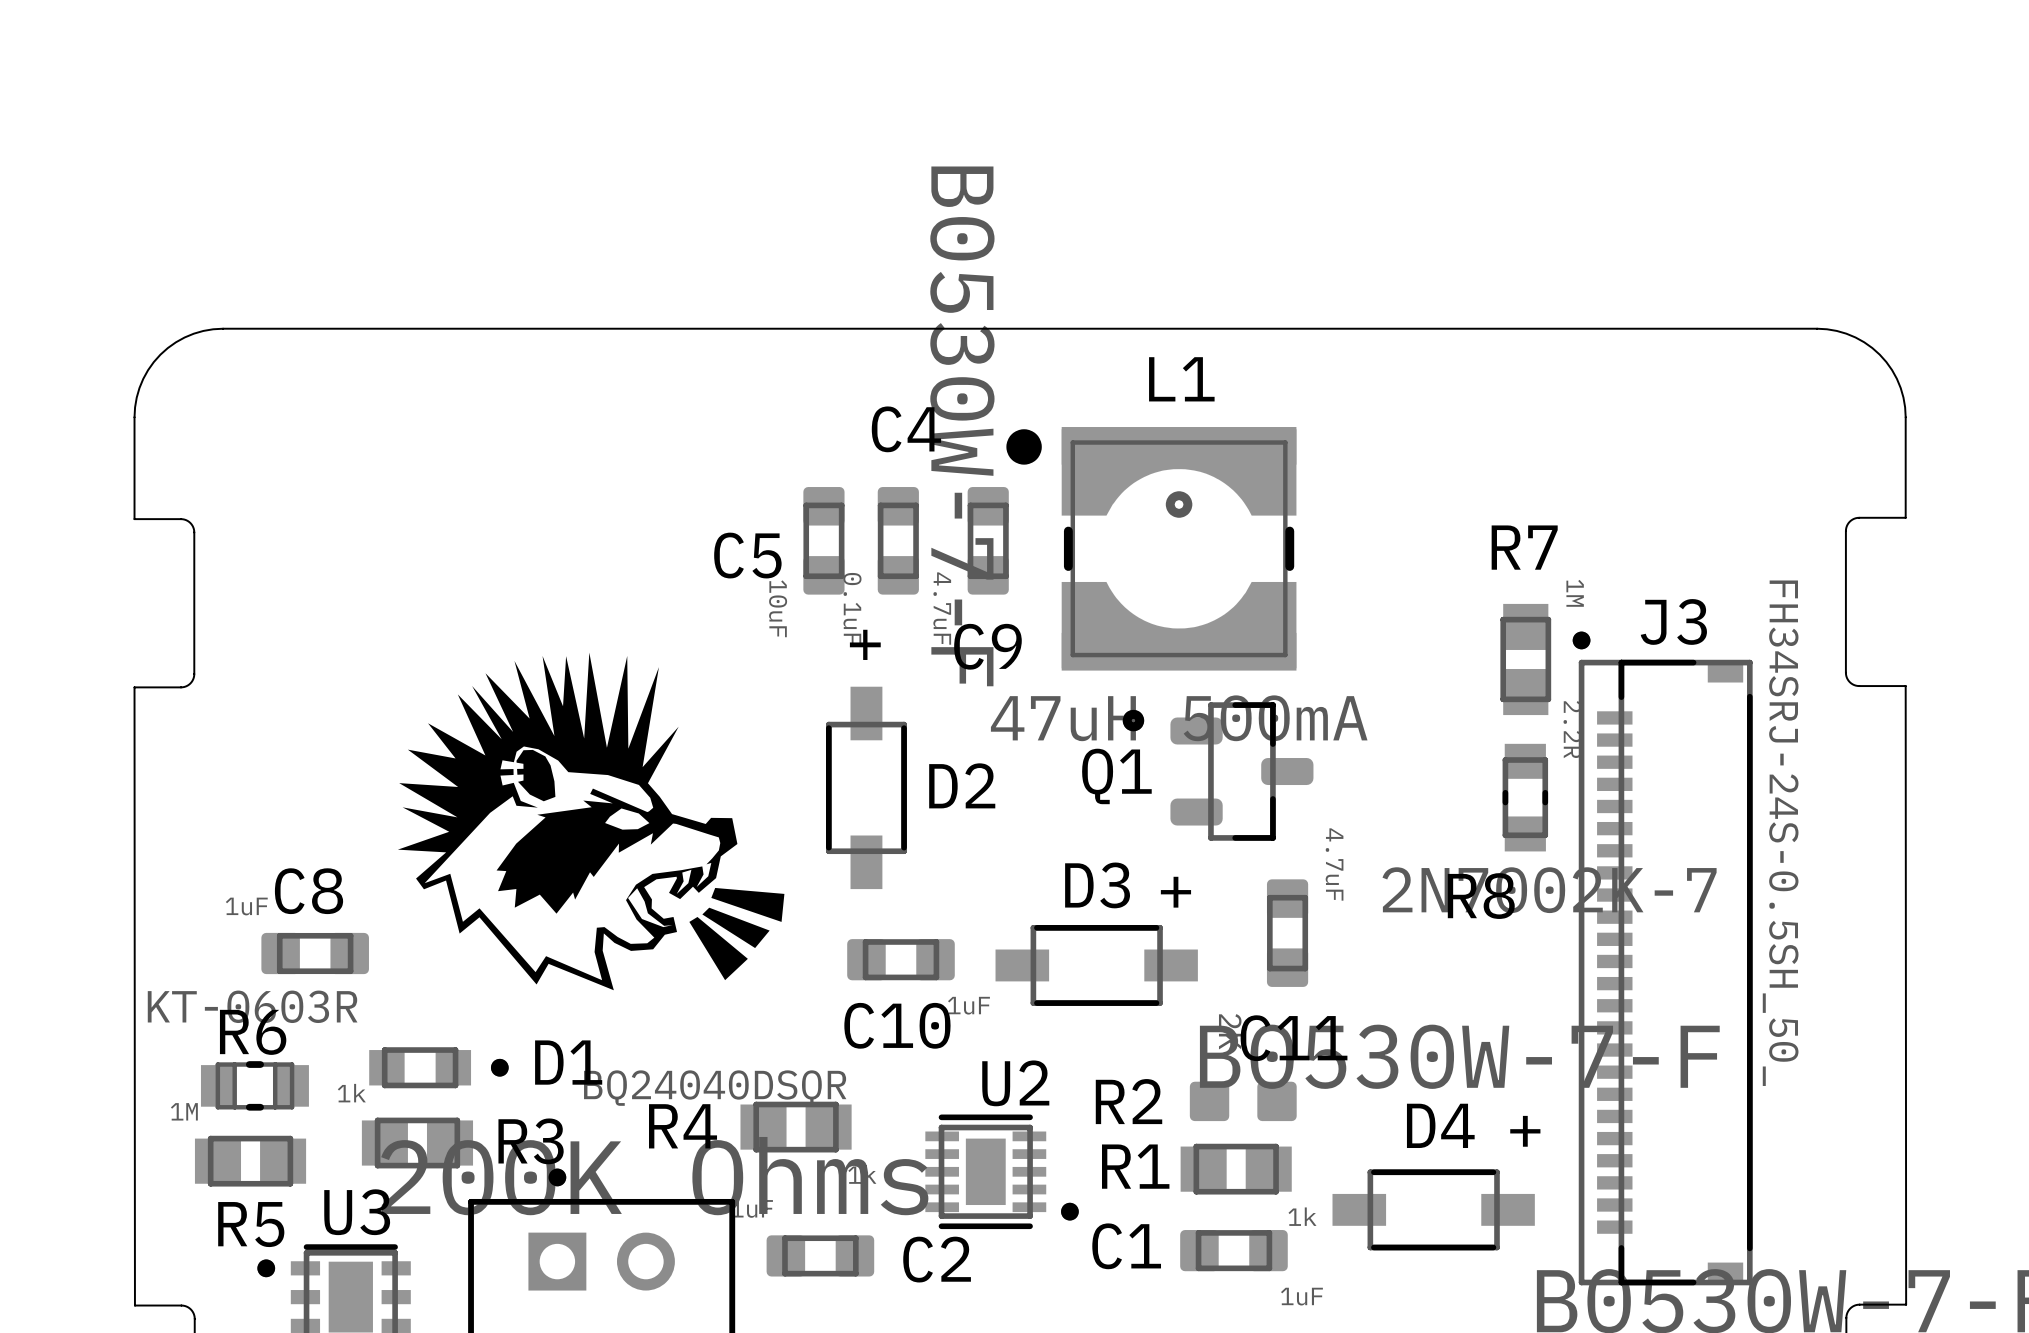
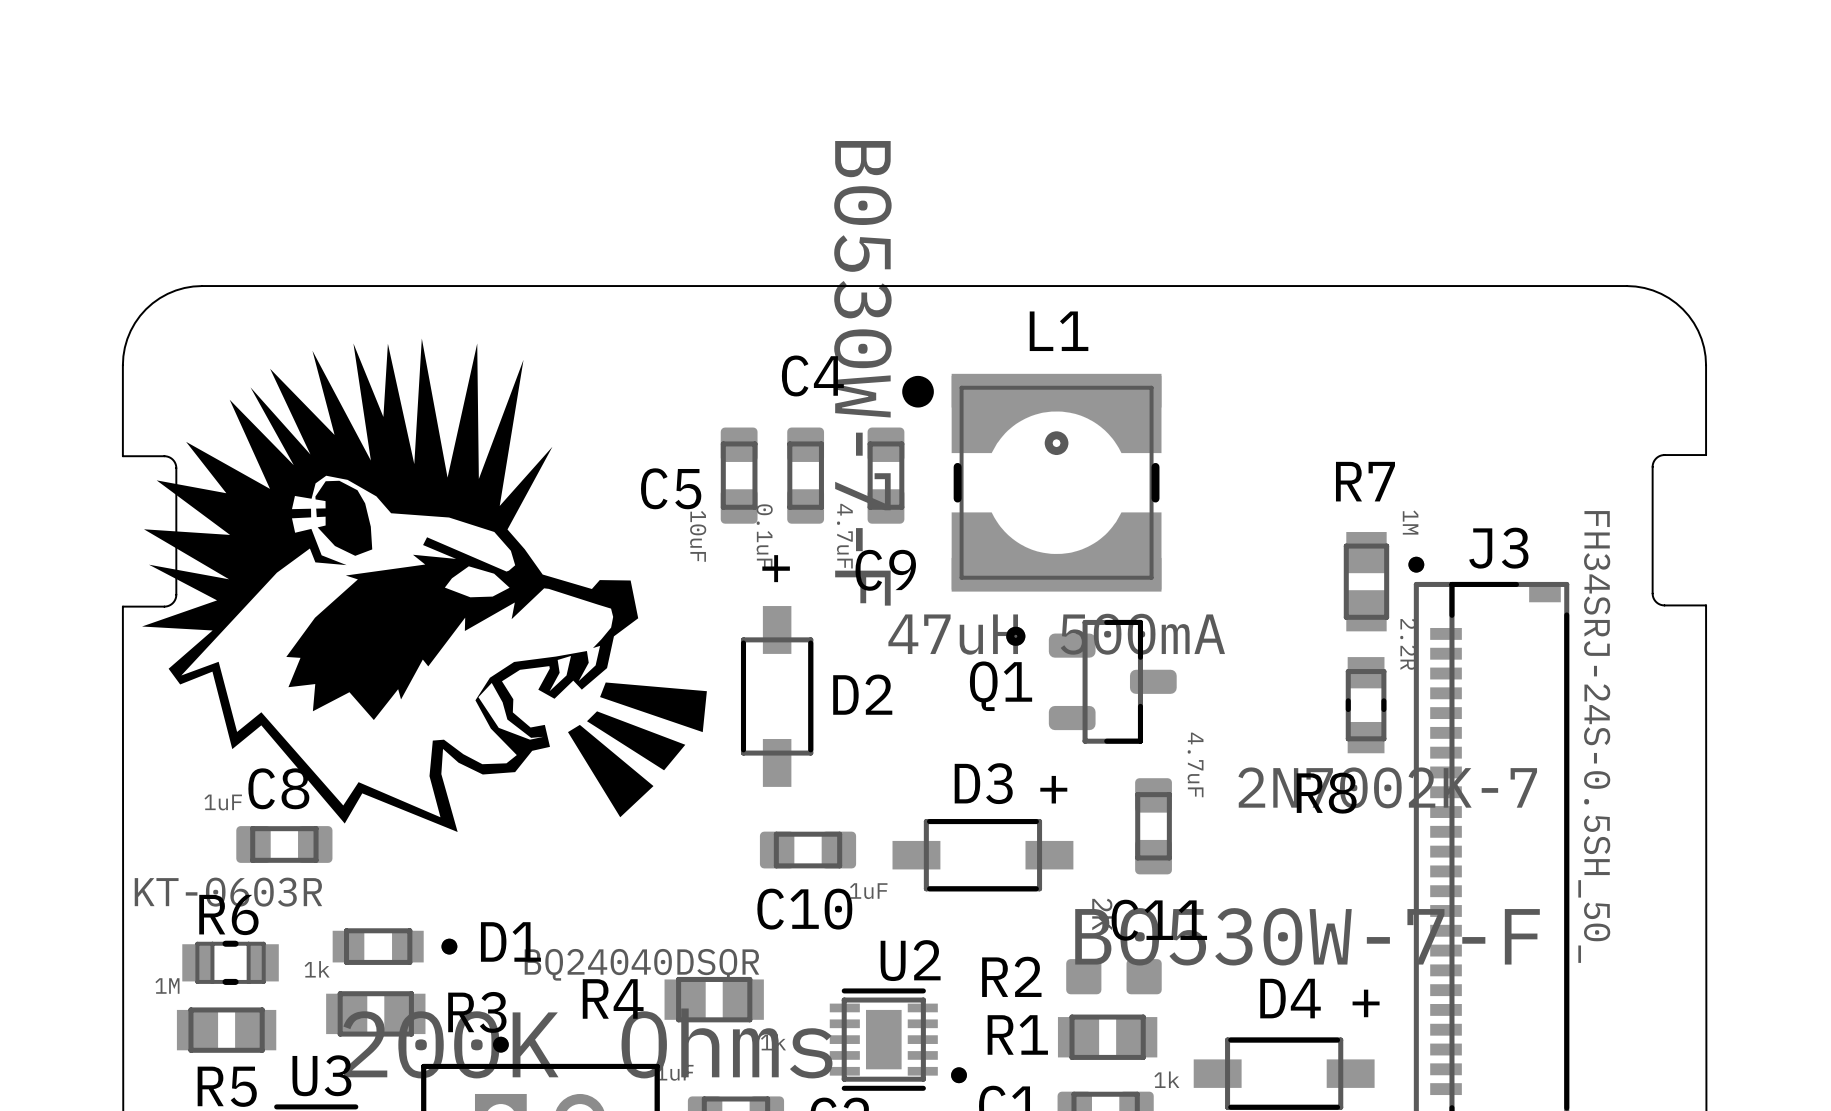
drawing: none -> [142, 338, 707, 833]
drawing: [397, 652, 785, 991] -> none

